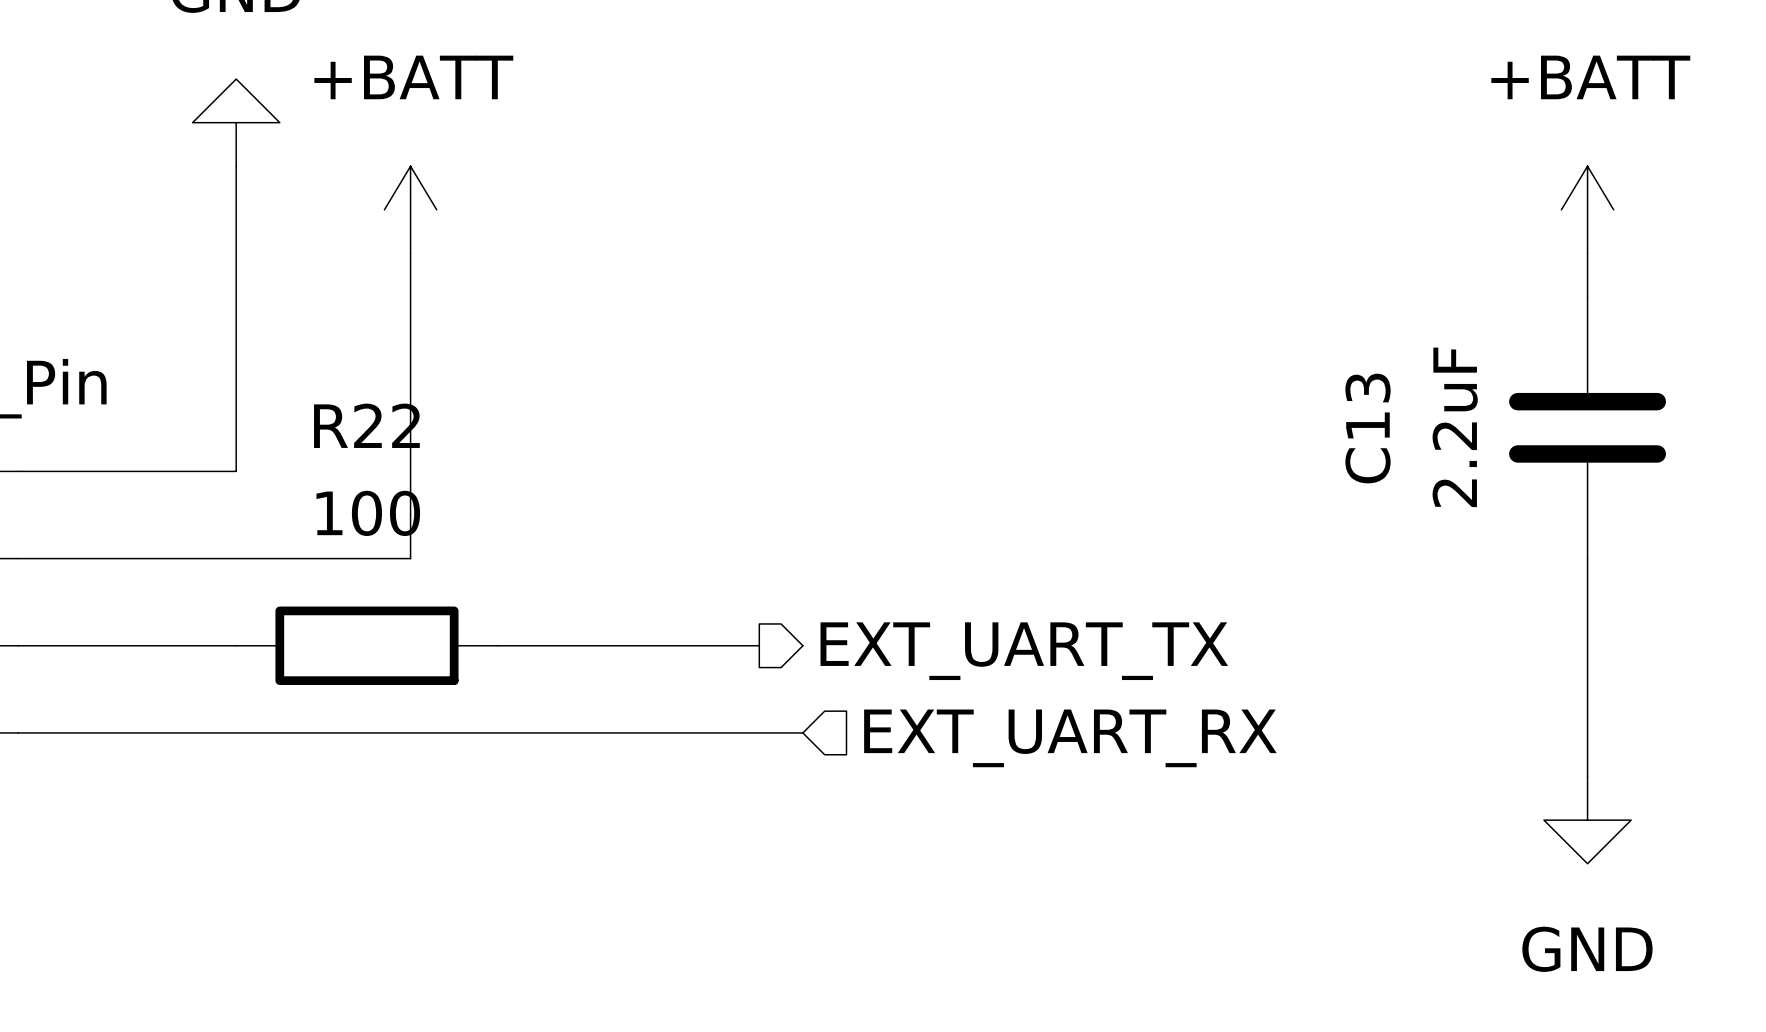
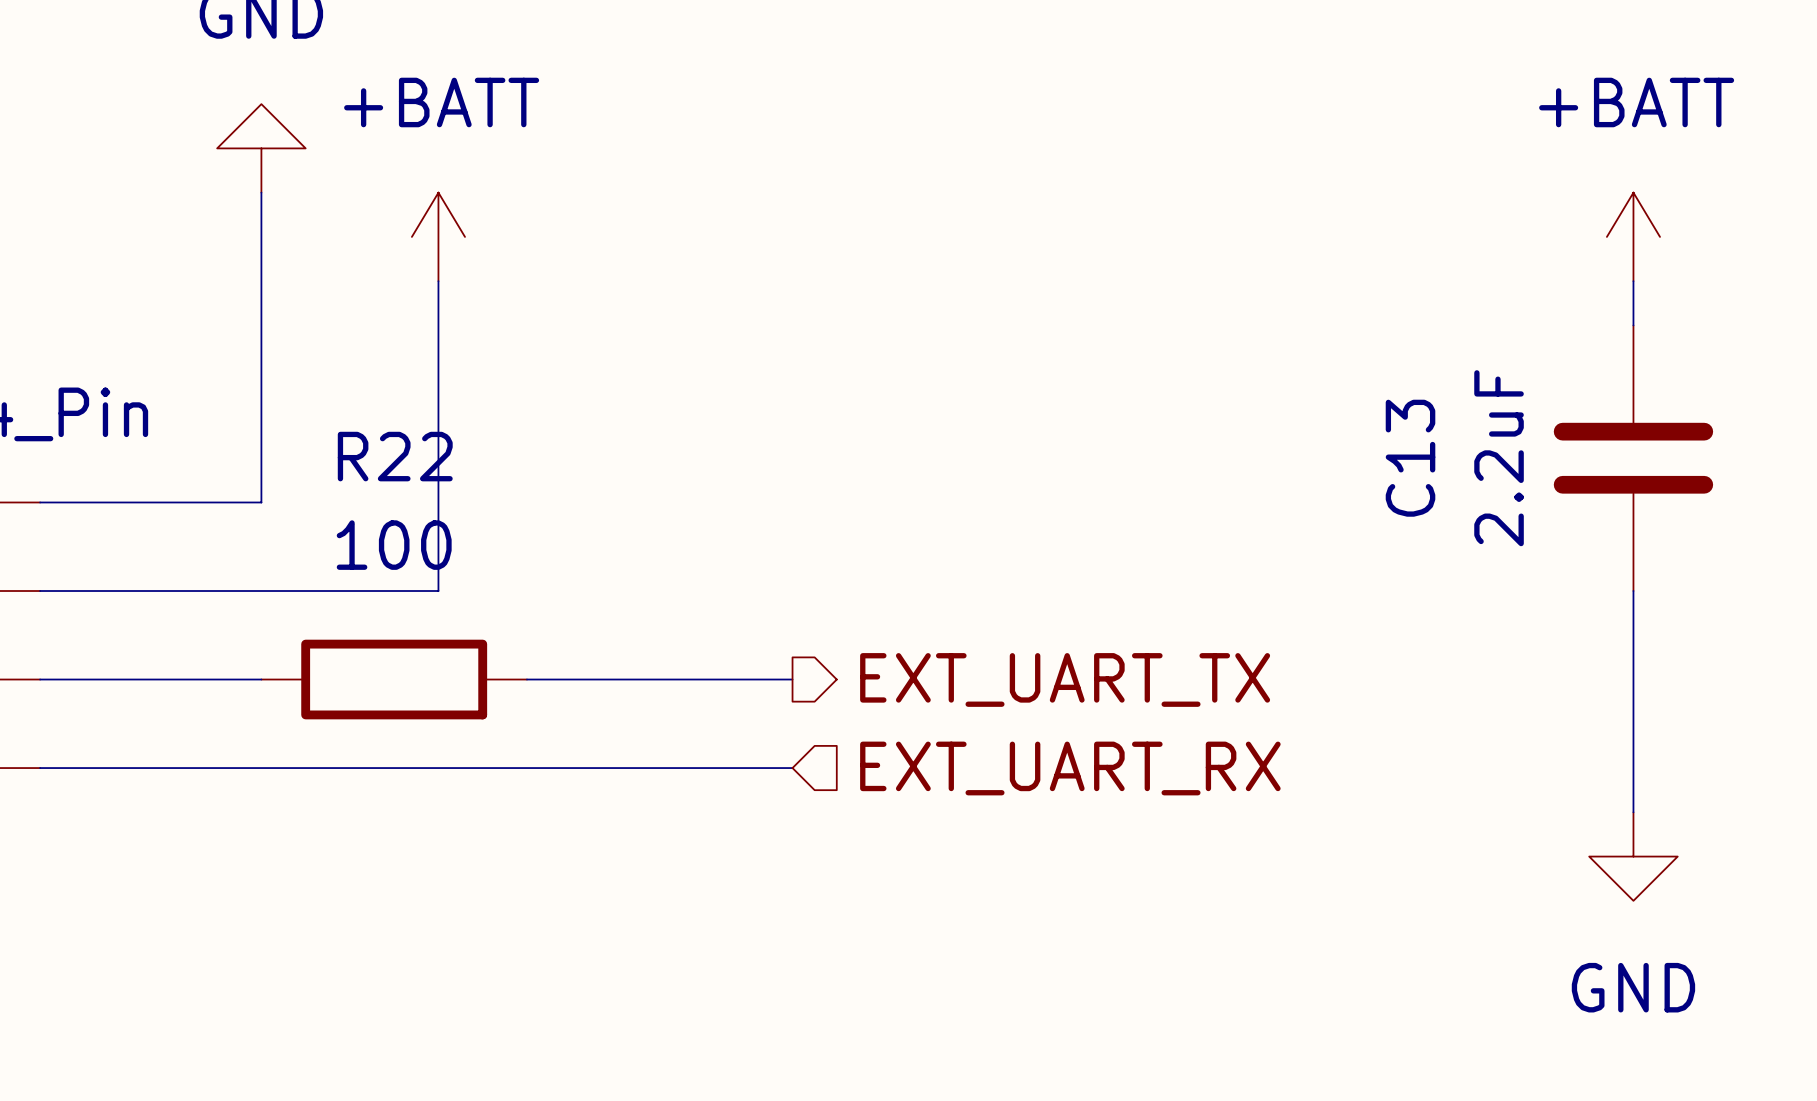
wire: (759, 732) (802, 732) -> none
hierarchical label position: EXT_UART_RX (1070, 738) -> EXT_UART_RX (1070, 768)

